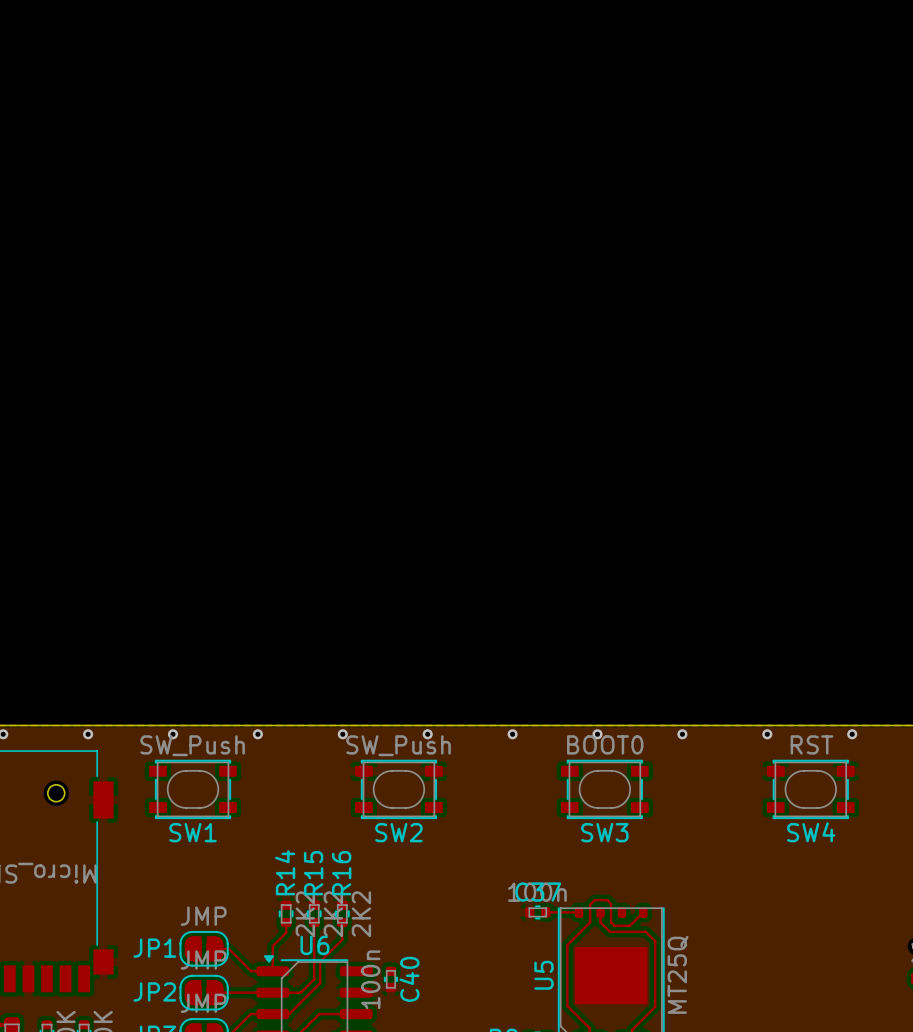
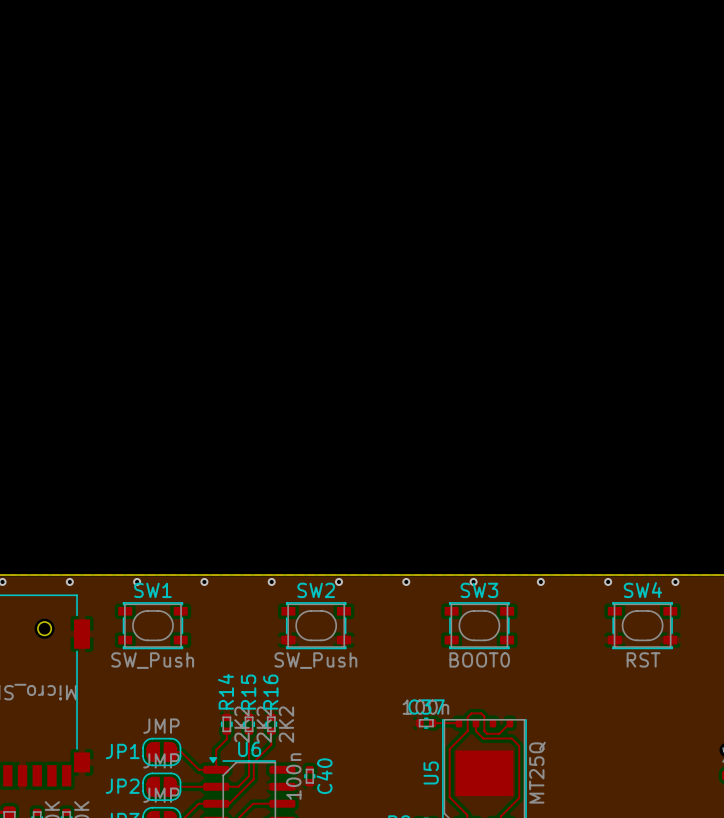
SW3 value position: BOOT0 (605, 744) -> BOOT0 (479, 659)
SW4 value position: RST (811, 744) -> RST (643, 659)
SW1 value position: SW_Push (192, 745) -> SW_Push (152, 660)
SW2 value position: SW_Push (398, 745) -> SW_Push (315, 660)
SW1 name position: SW1 (193, 832) -> SW1 (152, 590)
SW2 name position: SW2 (398, 832) -> SW2 (316, 590)
SW3 name position: SW3 (604, 832) -> SW3 (479, 590)
SW4 name position: SW4 (811, 832) -> SW4 (642, 590)

